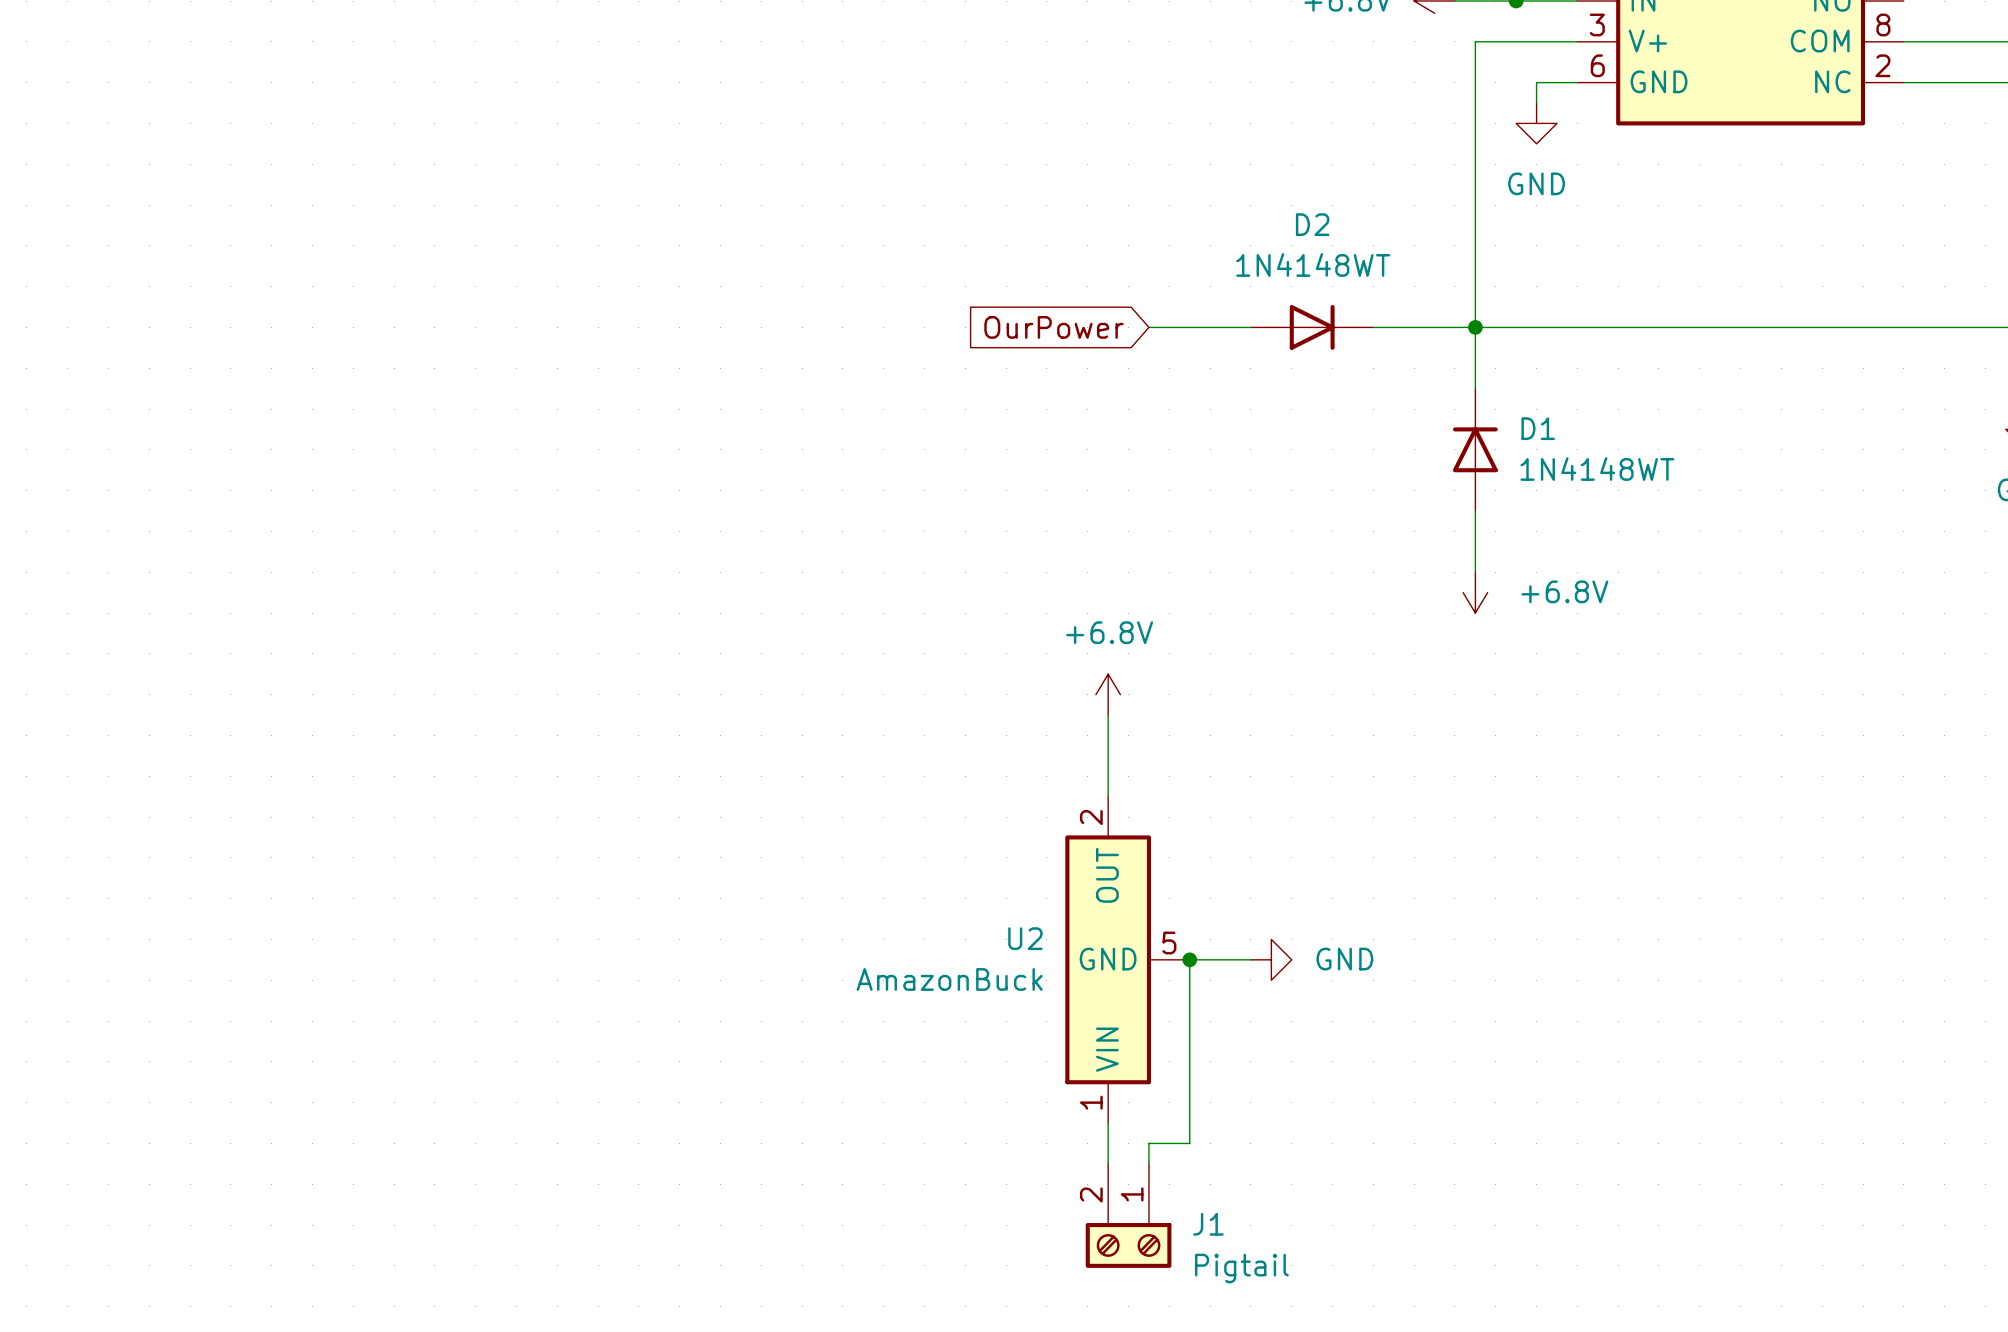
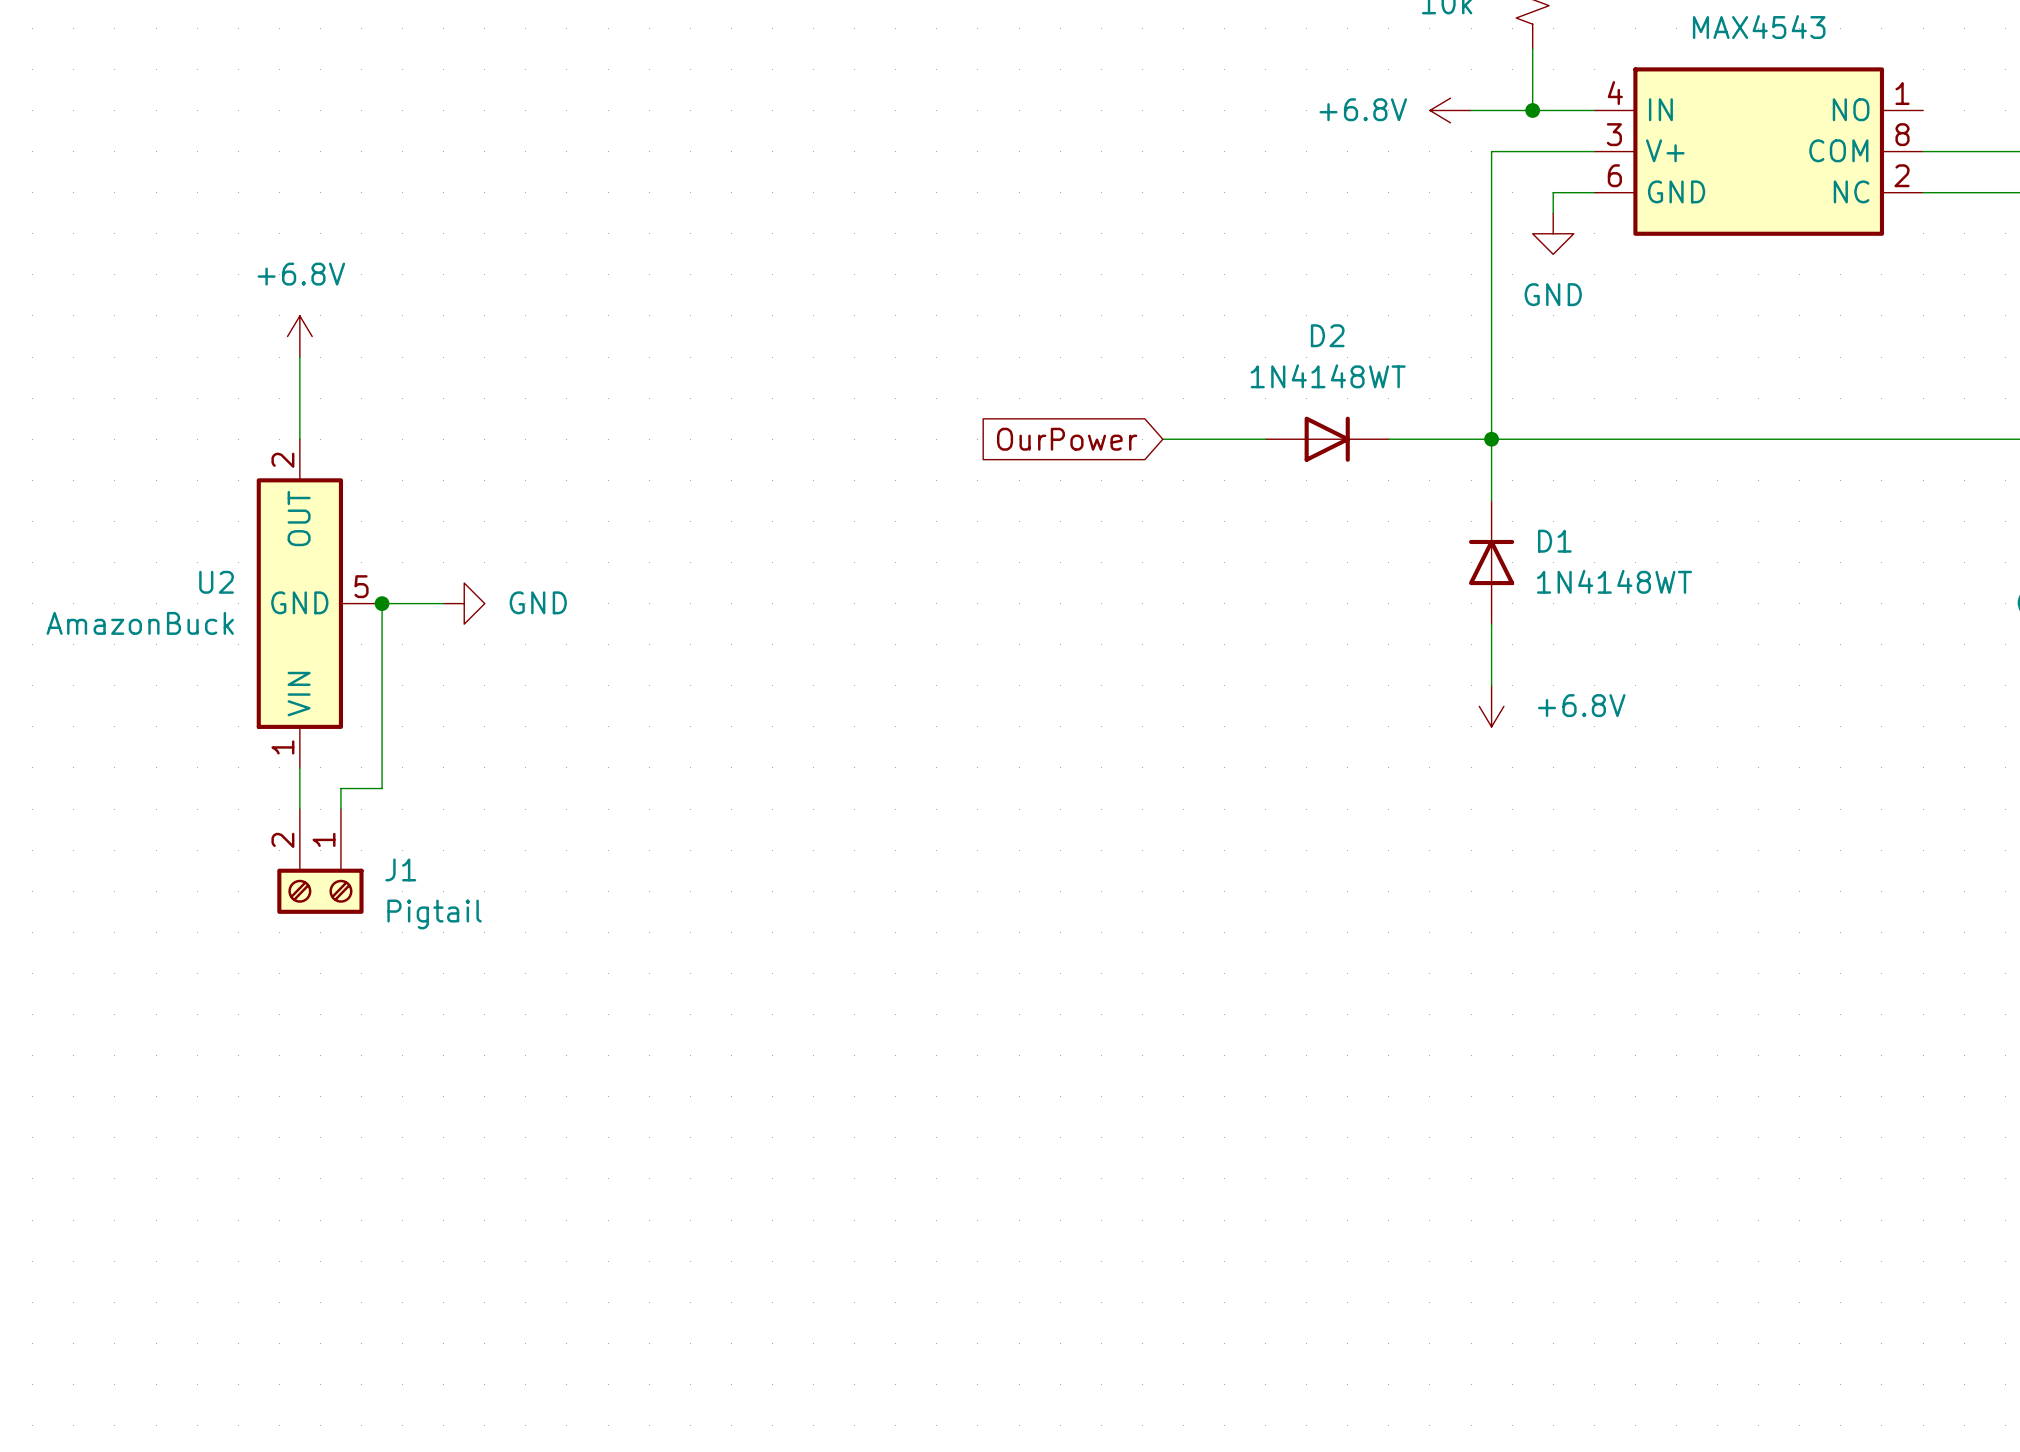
power symbol: none -> +6.8V (299, 336)
wire: none -> (299, 357) (299, 439)
junction: none -> (382, 603)
wire: none -> (443, 603) (382, 603) (382, 788) (340, 788) (340, 809)
power symbol: none -> GND (464, 603)
wire: none -> (299, 767) (299, 809)
power symbol: +6.8V (1108, 694) -> none
wire: (1108, 715) (1108, 796) -> none
U2 position: (1127, 959) -> (319, 603)
junction: (1189, 959) -> none
wire: (1250, 959) (1189, 959) (1189, 1143) (1148, 1143) (1148, 1163) -> none
power symbol: GND (1271, 959) -> none
wire: (1108, 1123) (1108, 1163) -> none
J1 position: (1128, 1215) -> (320, 861)

